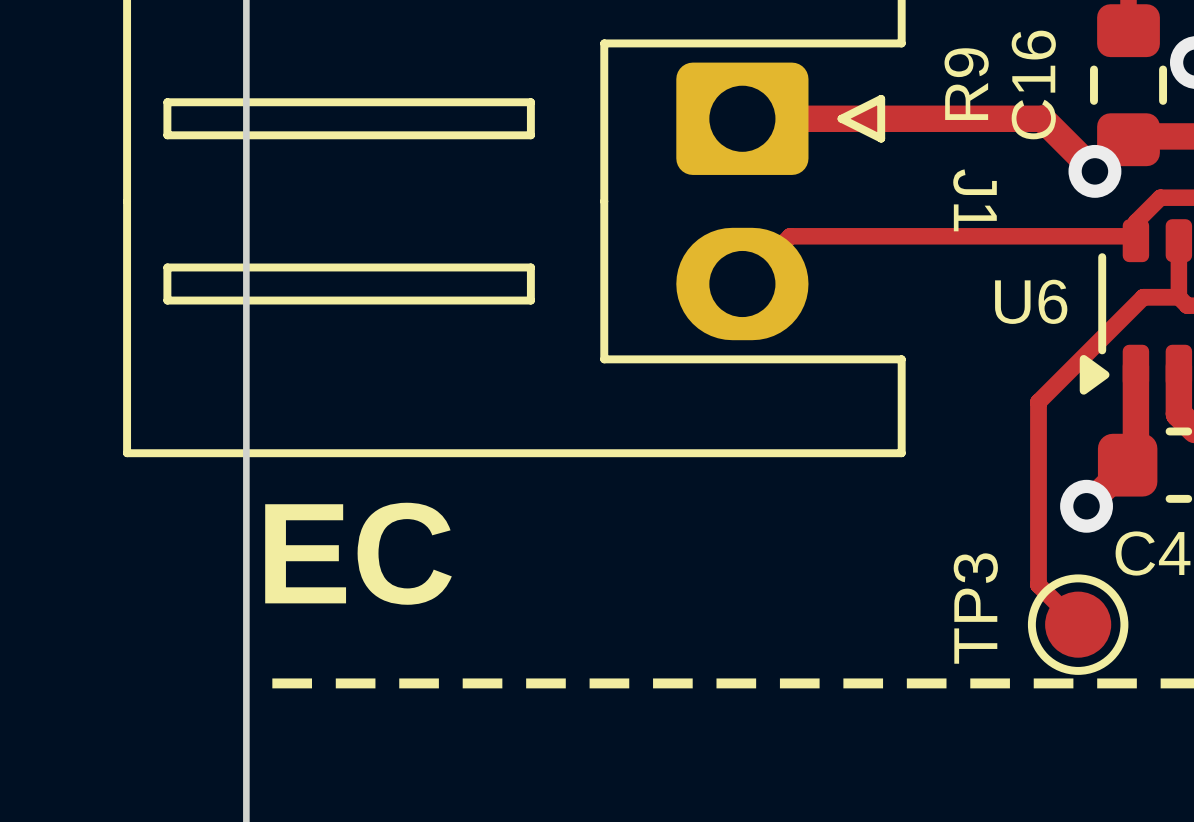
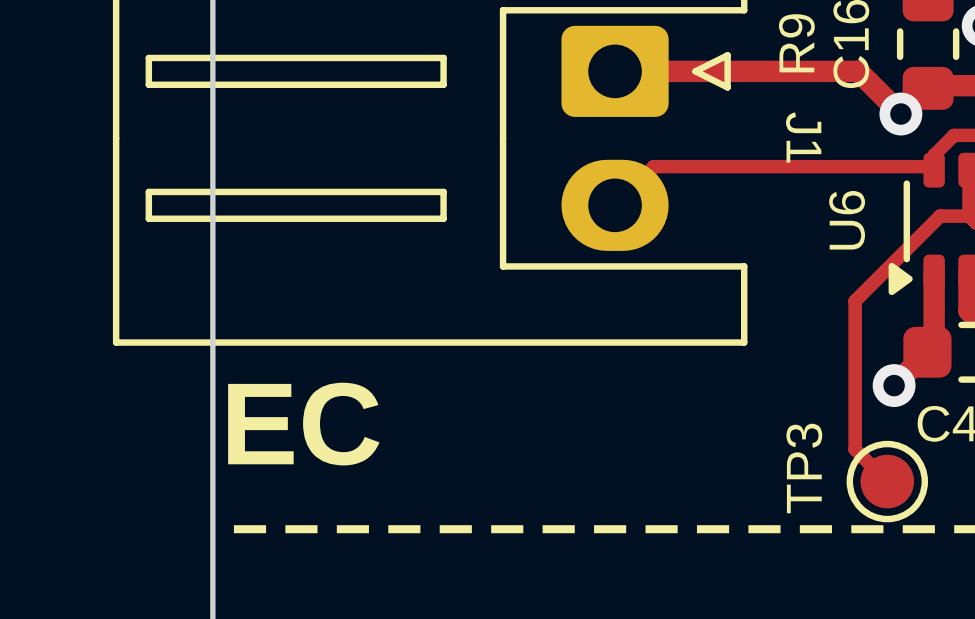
U6 name rotation: 0° (1031, 301) -> 90° counterclockwise (847, 220)

